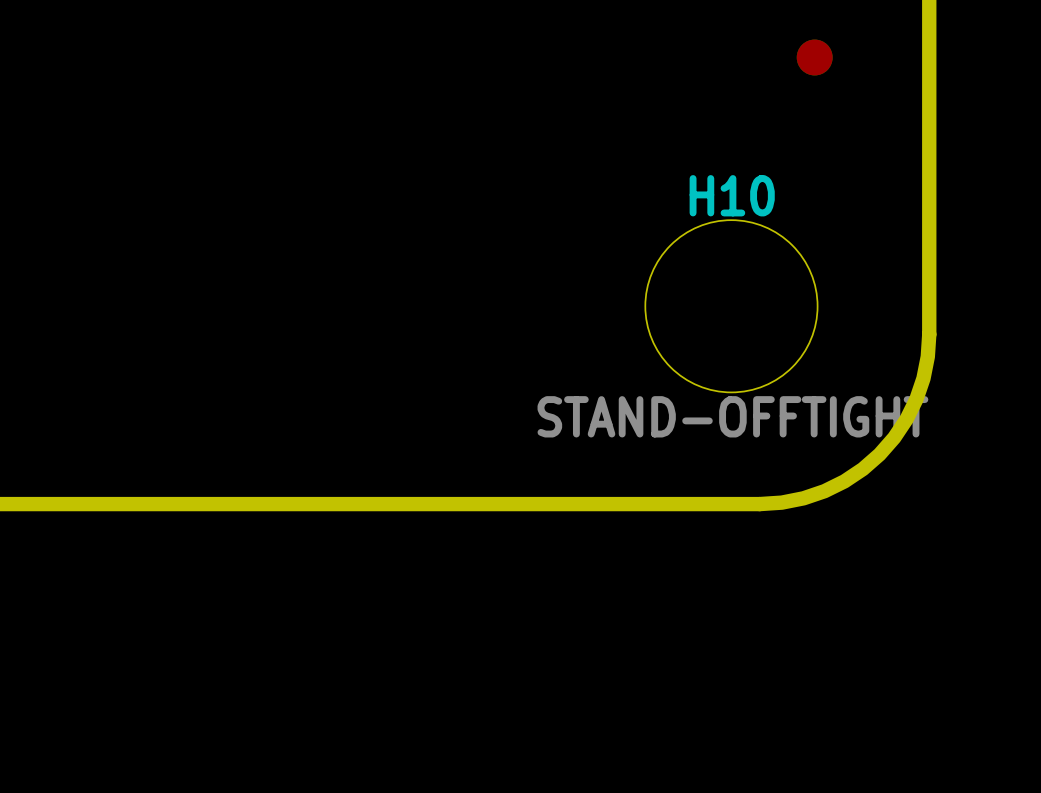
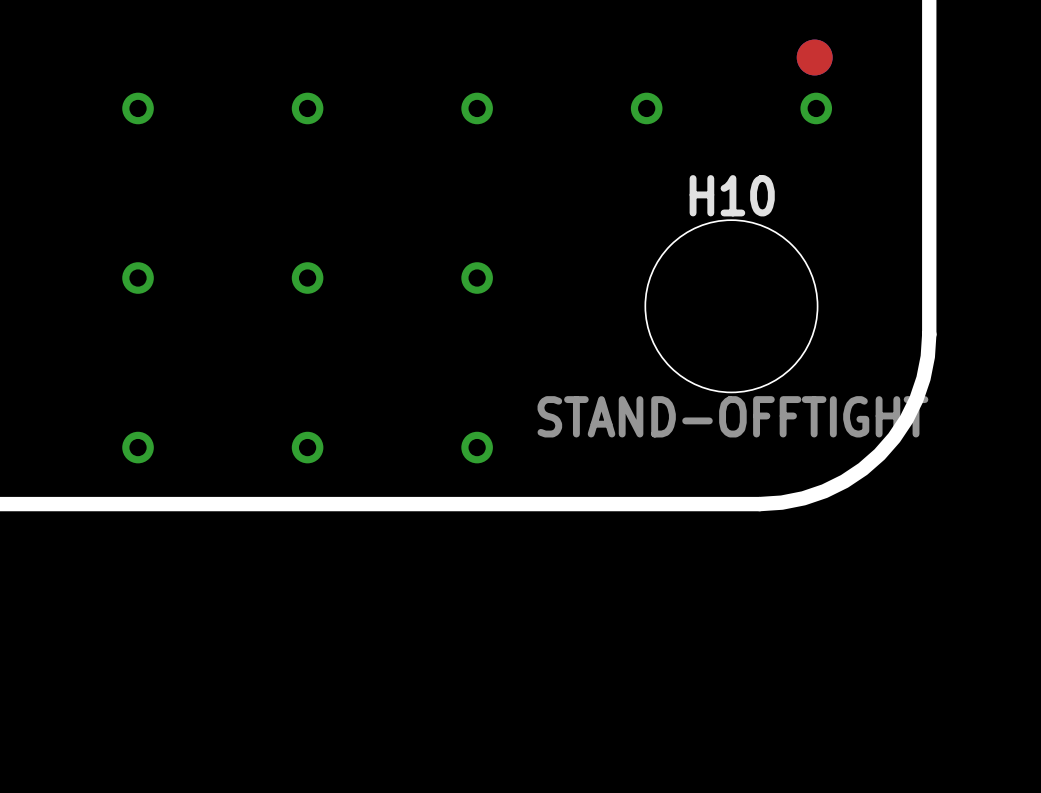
via: none -> (138, 108)
via: none -> (307, 108)
via: none -> (477, 108)
via: none -> (646, 108)
via: none -> (816, 108)
via: none -> (138, 278)
via: none -> (307, 278)
via: none -> (477, 278)
via: none -> (138, 447)
via: none -> (307, 447)
via: none -> (477, 447)

